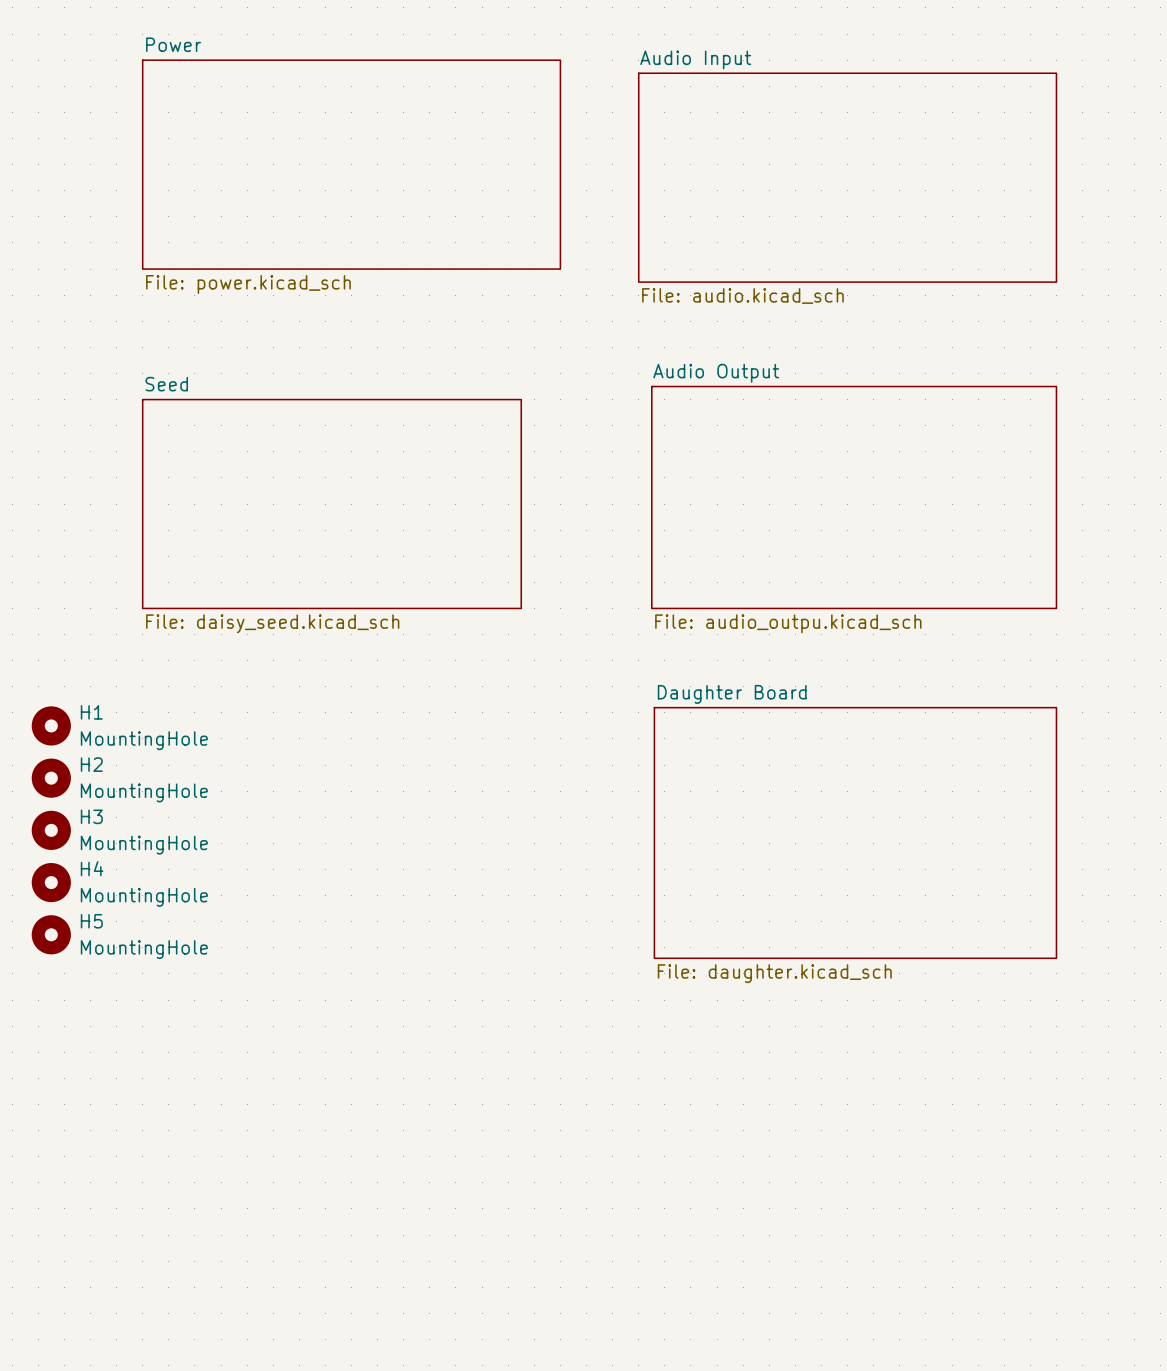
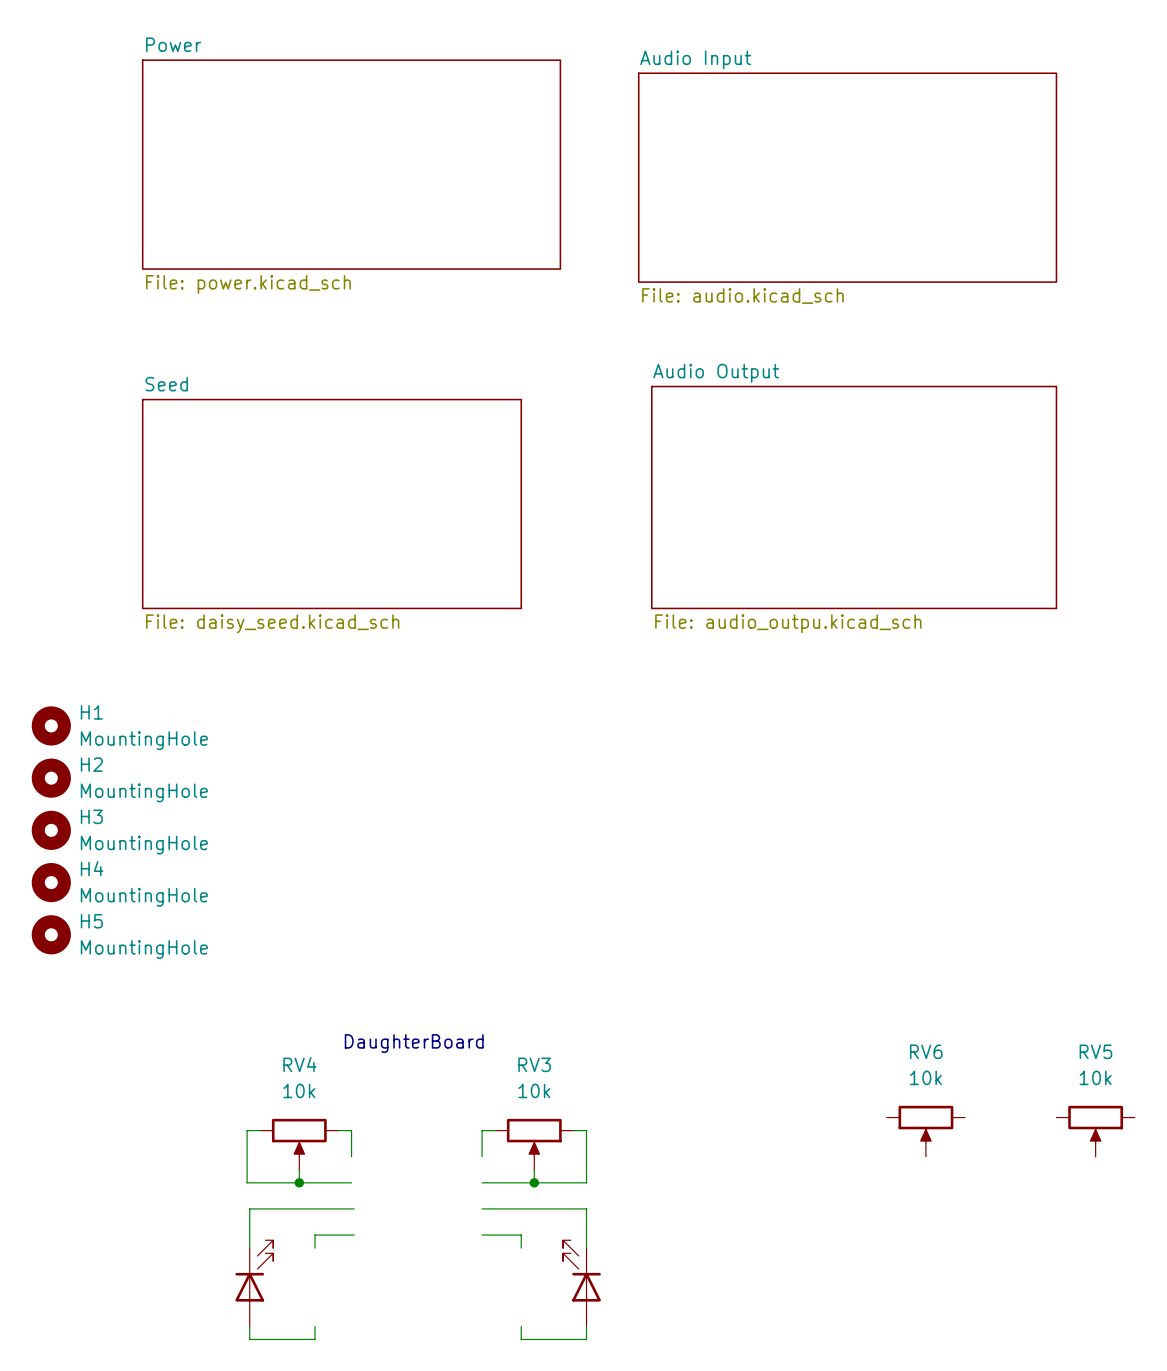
sheet Daughter Board: File: daughter.kicad_sch (855, 832) -> none
text: none -> DaughterBoard (414, 1043)
wire: none -> (260, 1130) (247, 1130) (247, 1182) (351, 1182)
wire: none -> (338, 1130) (351, 1130) (351, 1156)
wire: none -> (495, 1130) (482, 1130) (482, 1156)
wire: none -> (573, 1130) (586, 1130) (586, 1182) (482, 1182)
RV6: none -> 10k (925, 1131)
RV5: none -> 10k (1095, 1131)
RV4: none -> 10k (299, 1144)
RV3: none -> 10k (534, 1144)
wire: none -> (299, 1169) (299, 1182)
wire: none -> (534, 1169) (534, 1182)
junction: none -> (299, 1182)
junction: none -> (534, 1182)
wire: none -> (354, 1208) (249, 1208) (249, 1248)
wire: none -> (482, 1208) (586, 1208) (586, 1248)
wire: none -> (354, 1235) (315, 1235) (315, 1248)
wire: none -> (482, 1235) (521, 1235) (521, 1248)
part: none -> (254, 1283)
part: none -> (581, 1283)
wire: none -> (249, 1326) (249, 1339) (315, 1339) (315, 1326)
wire: none -> (521, 1326) (521, 1339) (586, 1339) (586, 1326)

